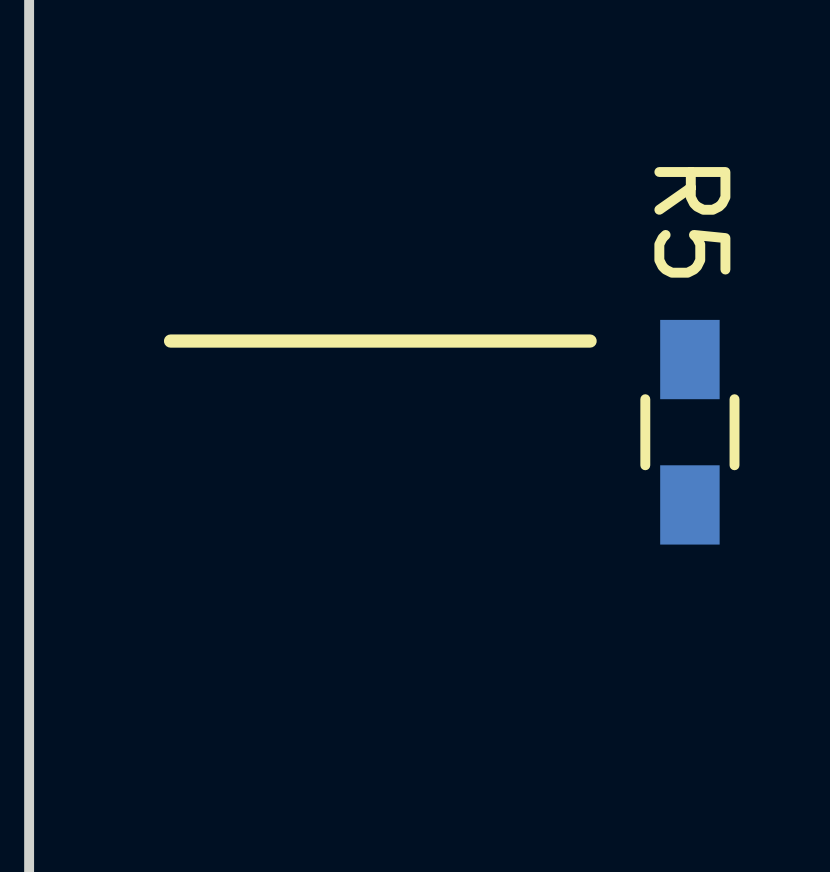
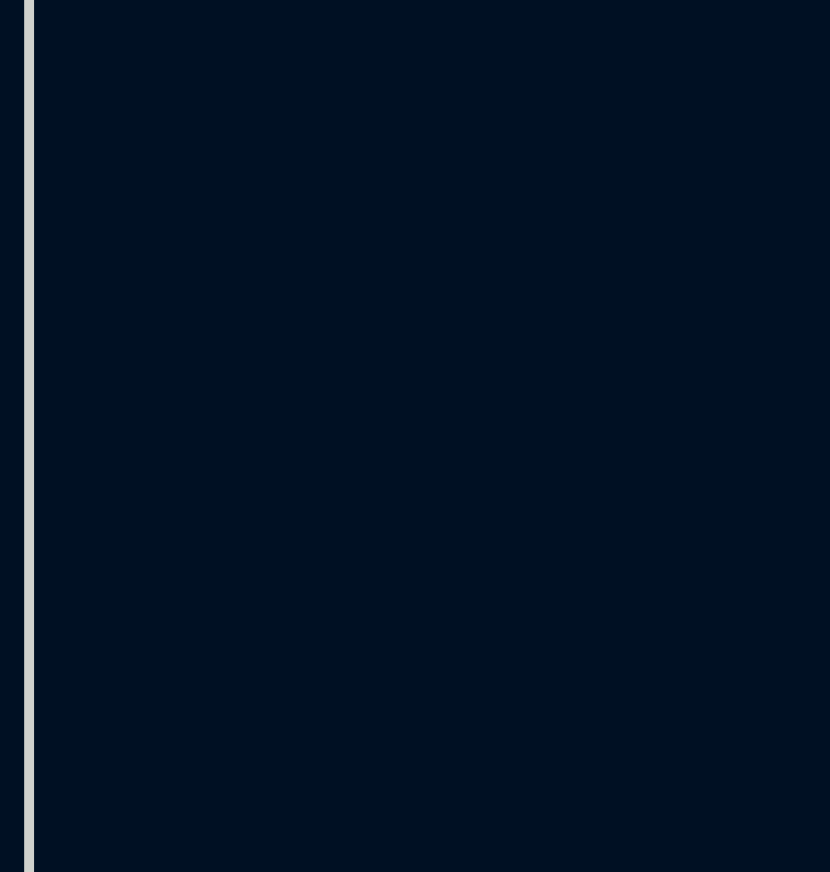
line: (590, 341) (170, 341) -> none
R5: (689, 432) -> none

